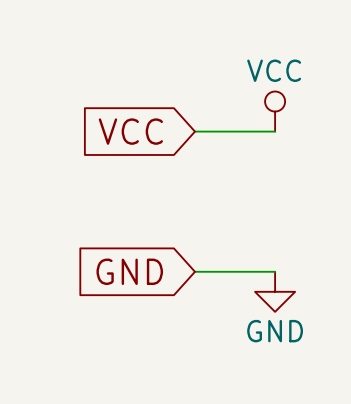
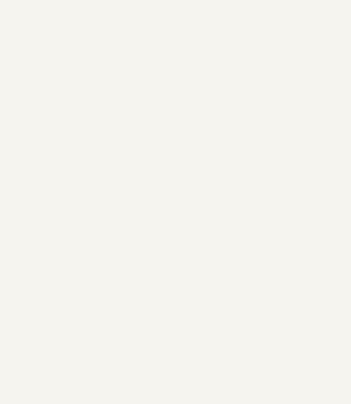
power symbol: VCC (275, 111) -> none
global label: VCC (130, 131) -> none
wire: (194, 131) (275, 131) -> none
global label: GND (129, 271) -> none
wire: (194, 271) (275, 271) -> none
power symbol: GND (275, 291) -> none

